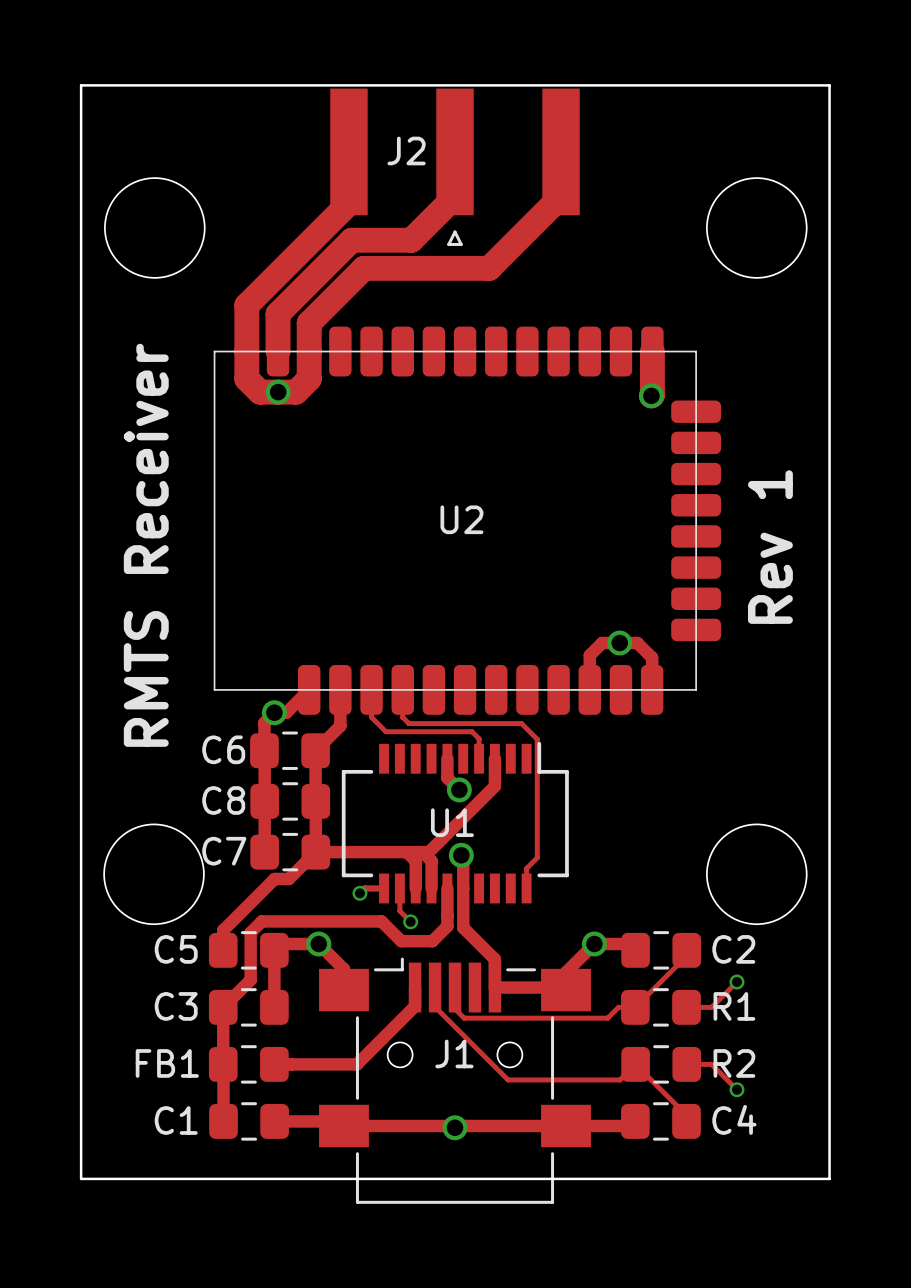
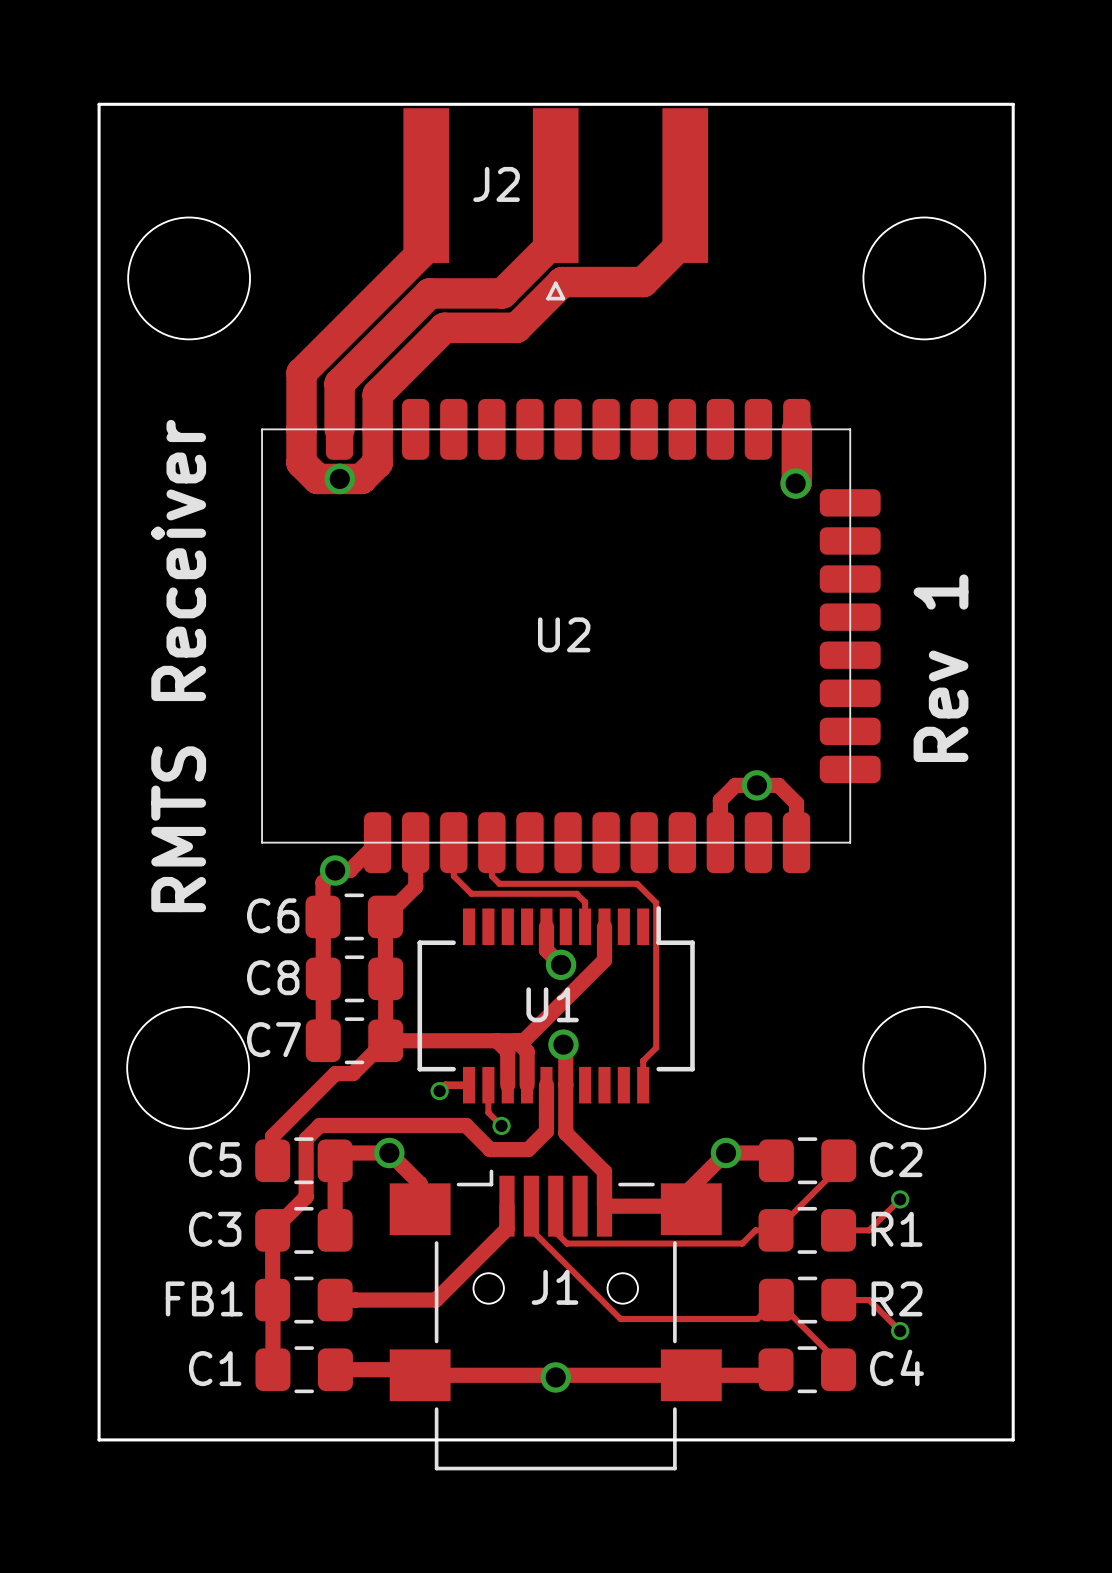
track: (526, 230) (489, 268) (422, 268) -> (643, 282) (562, 282) (516, 327)

